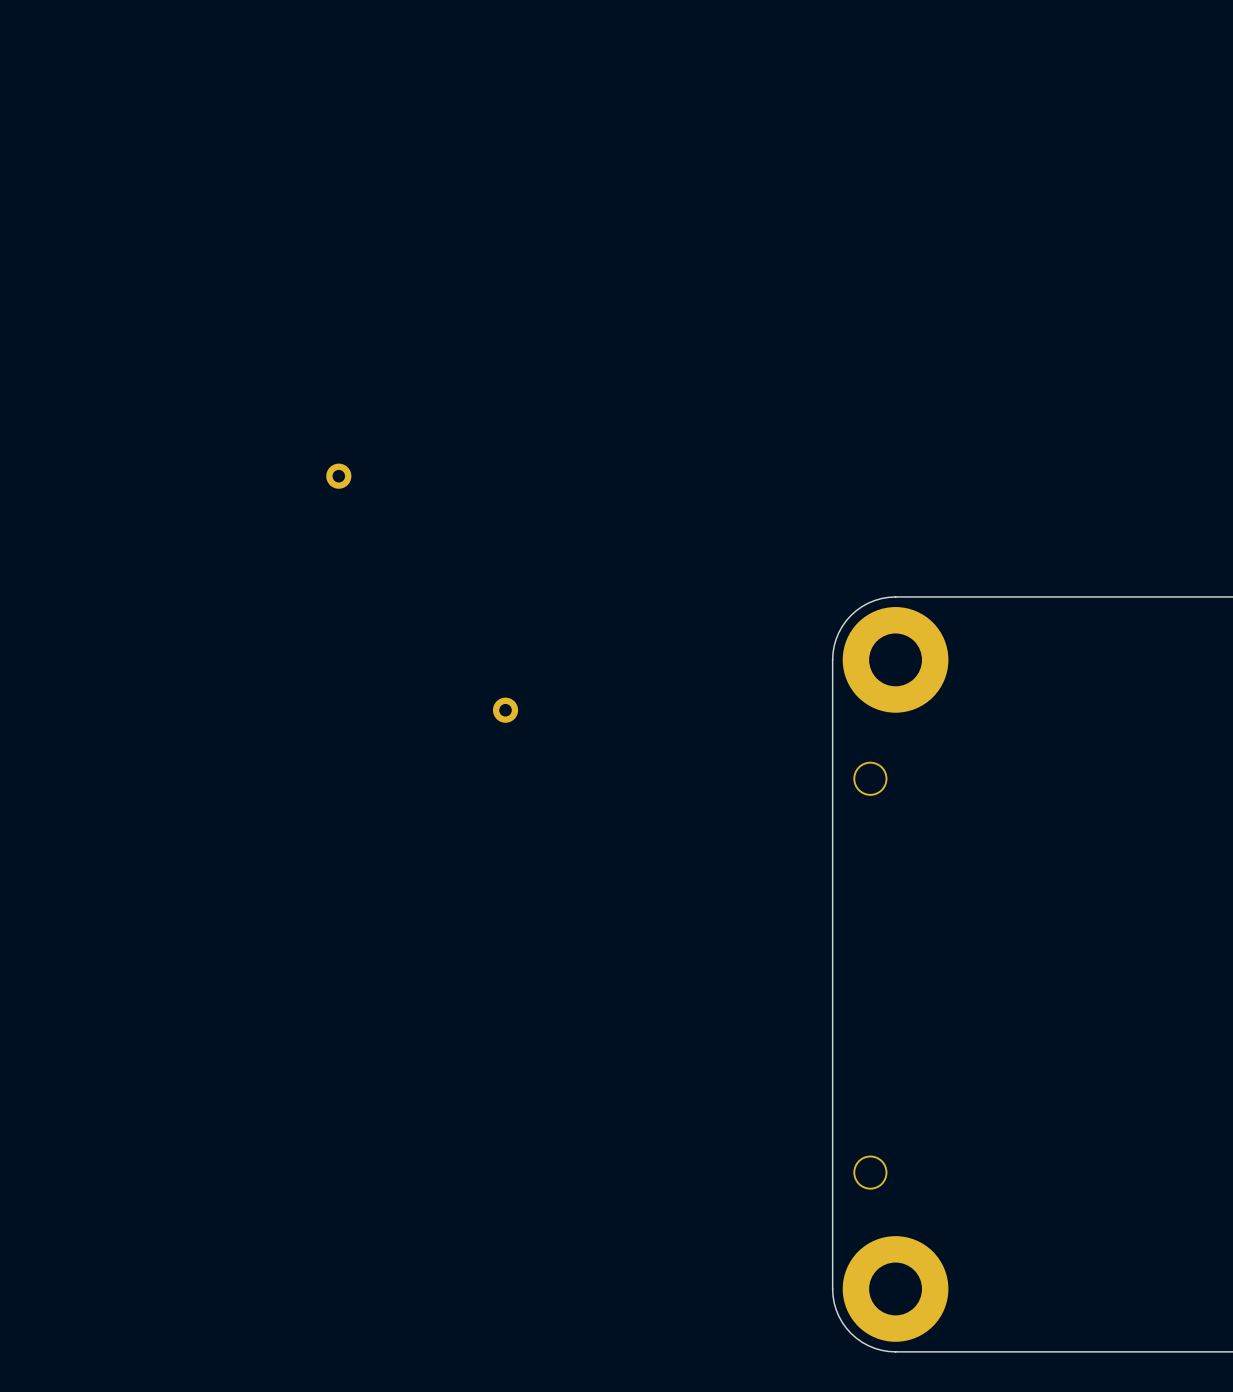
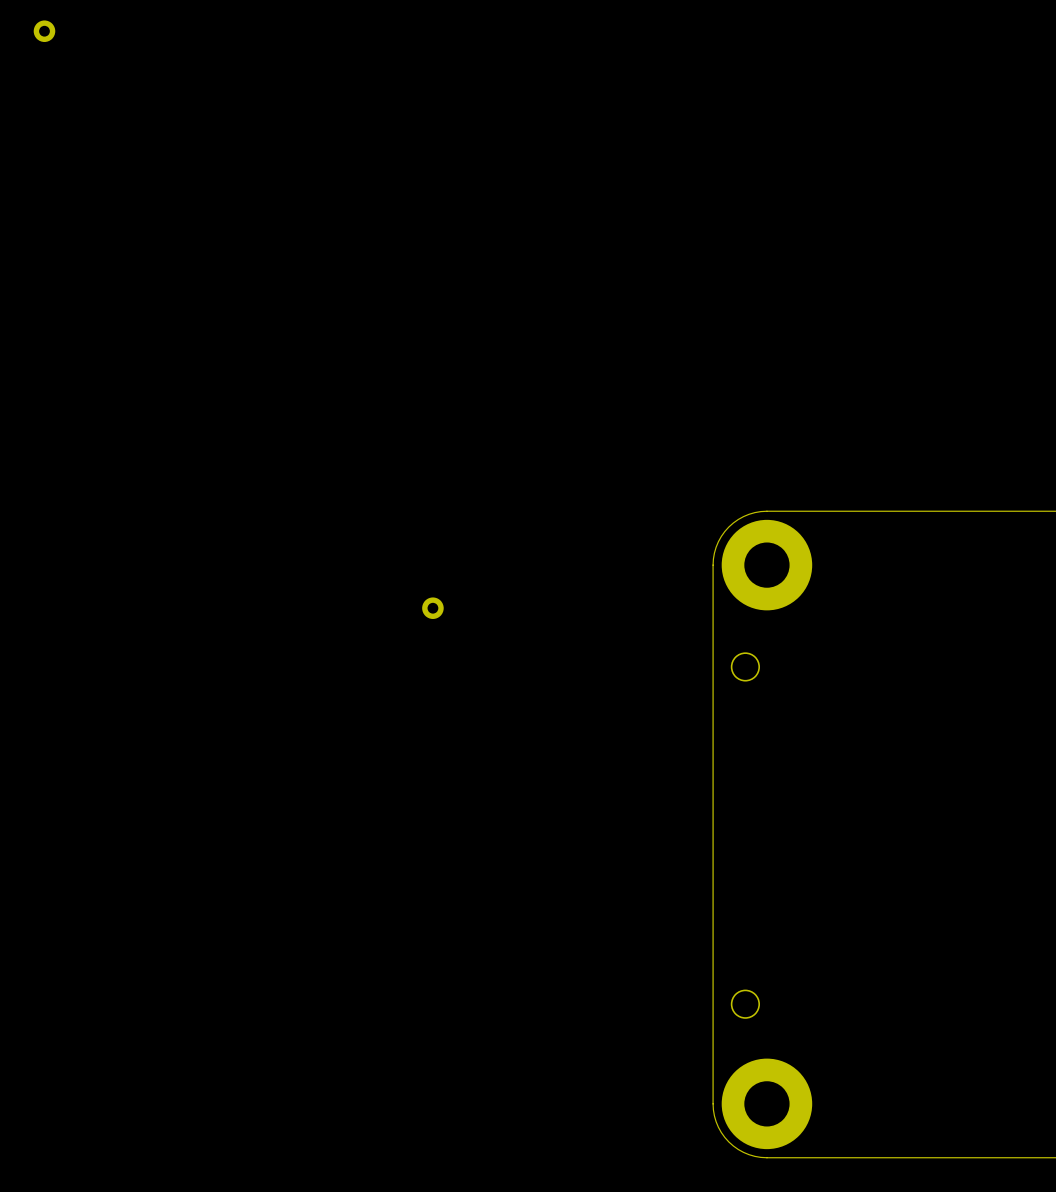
part: none -> (44, 31)
part: (338, 476) -> none

